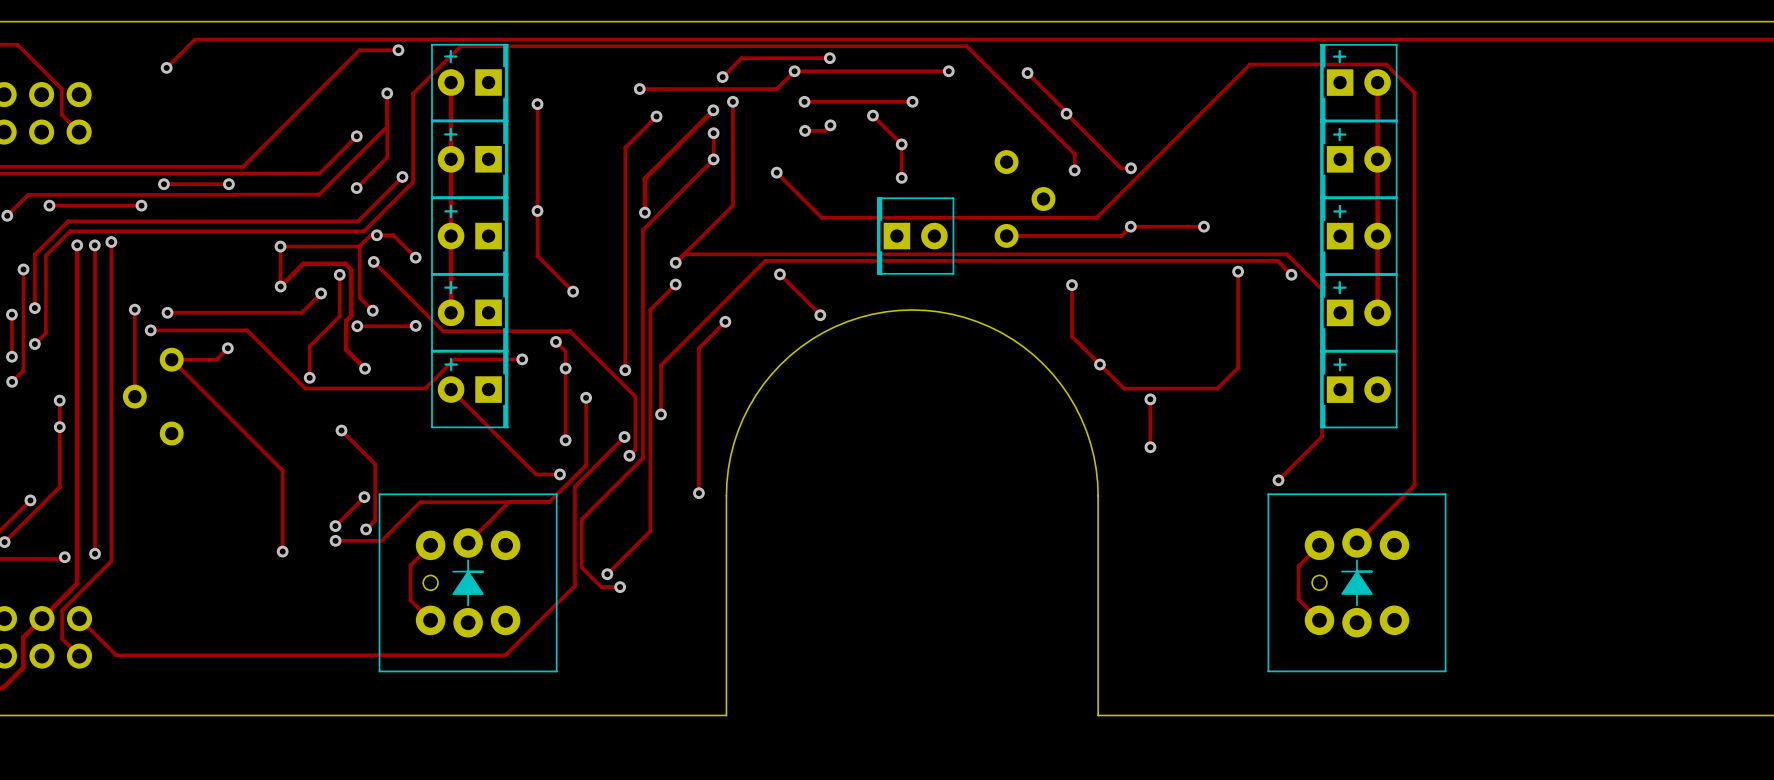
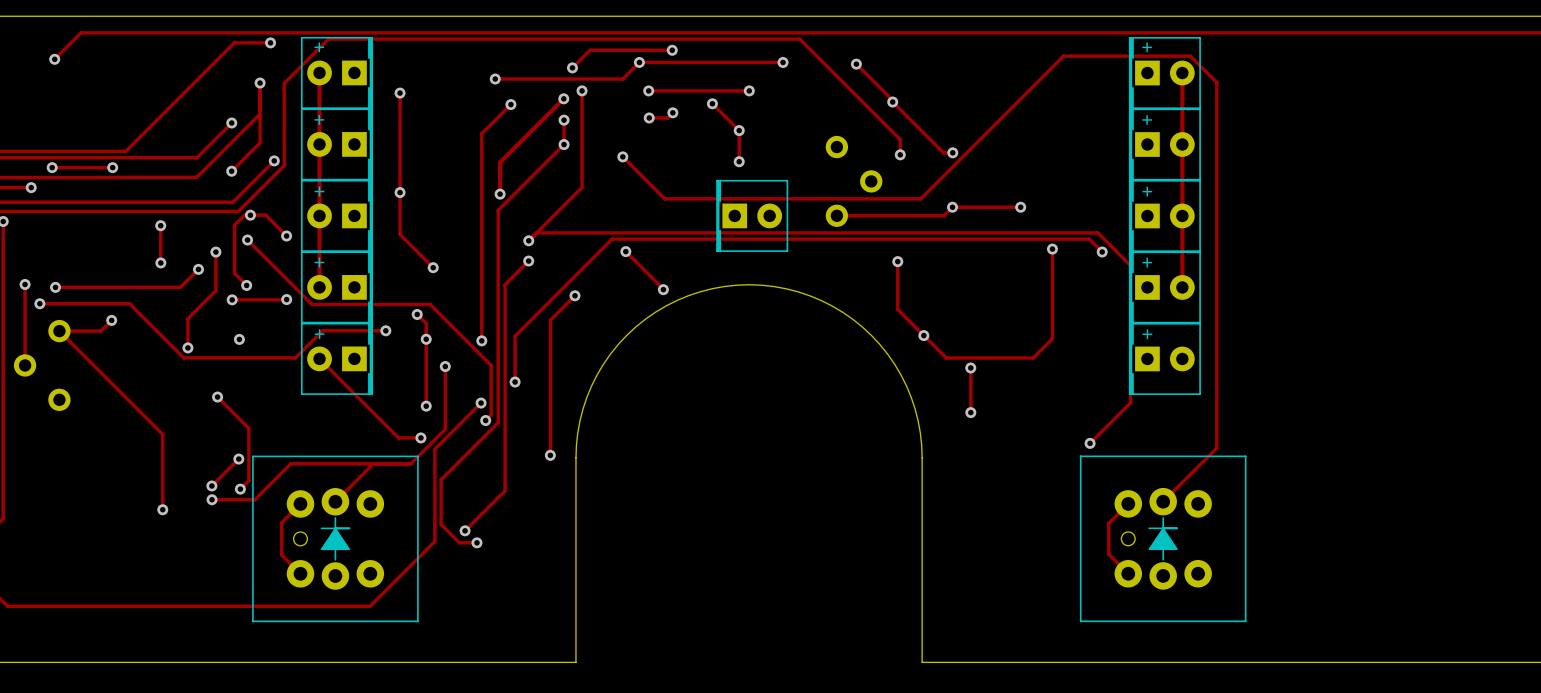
track: (280, 246) (359, 247) -> none
track: (280, 286) (303, 263) (345, 263) (351, 269) (351, 315) (346, 320) (346, 349) (365, 368) -> none

